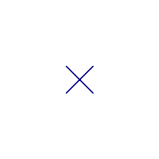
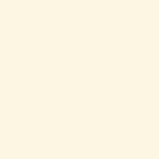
no-connect mark: (79, 79) -> none

